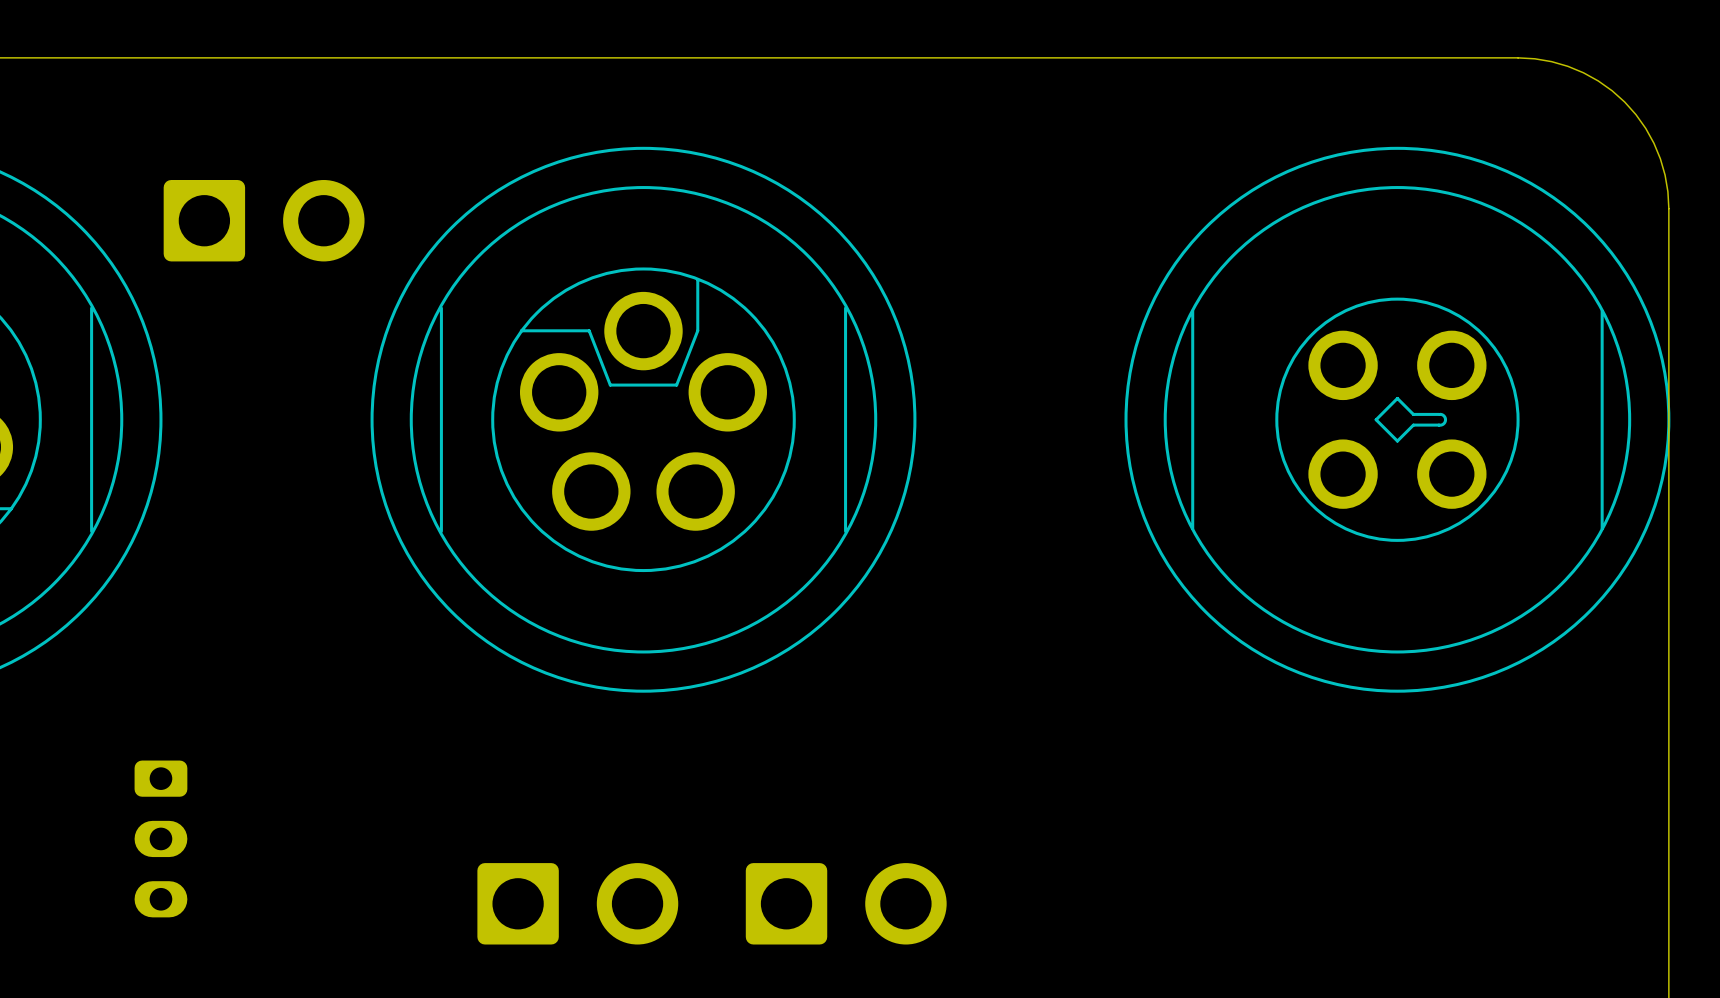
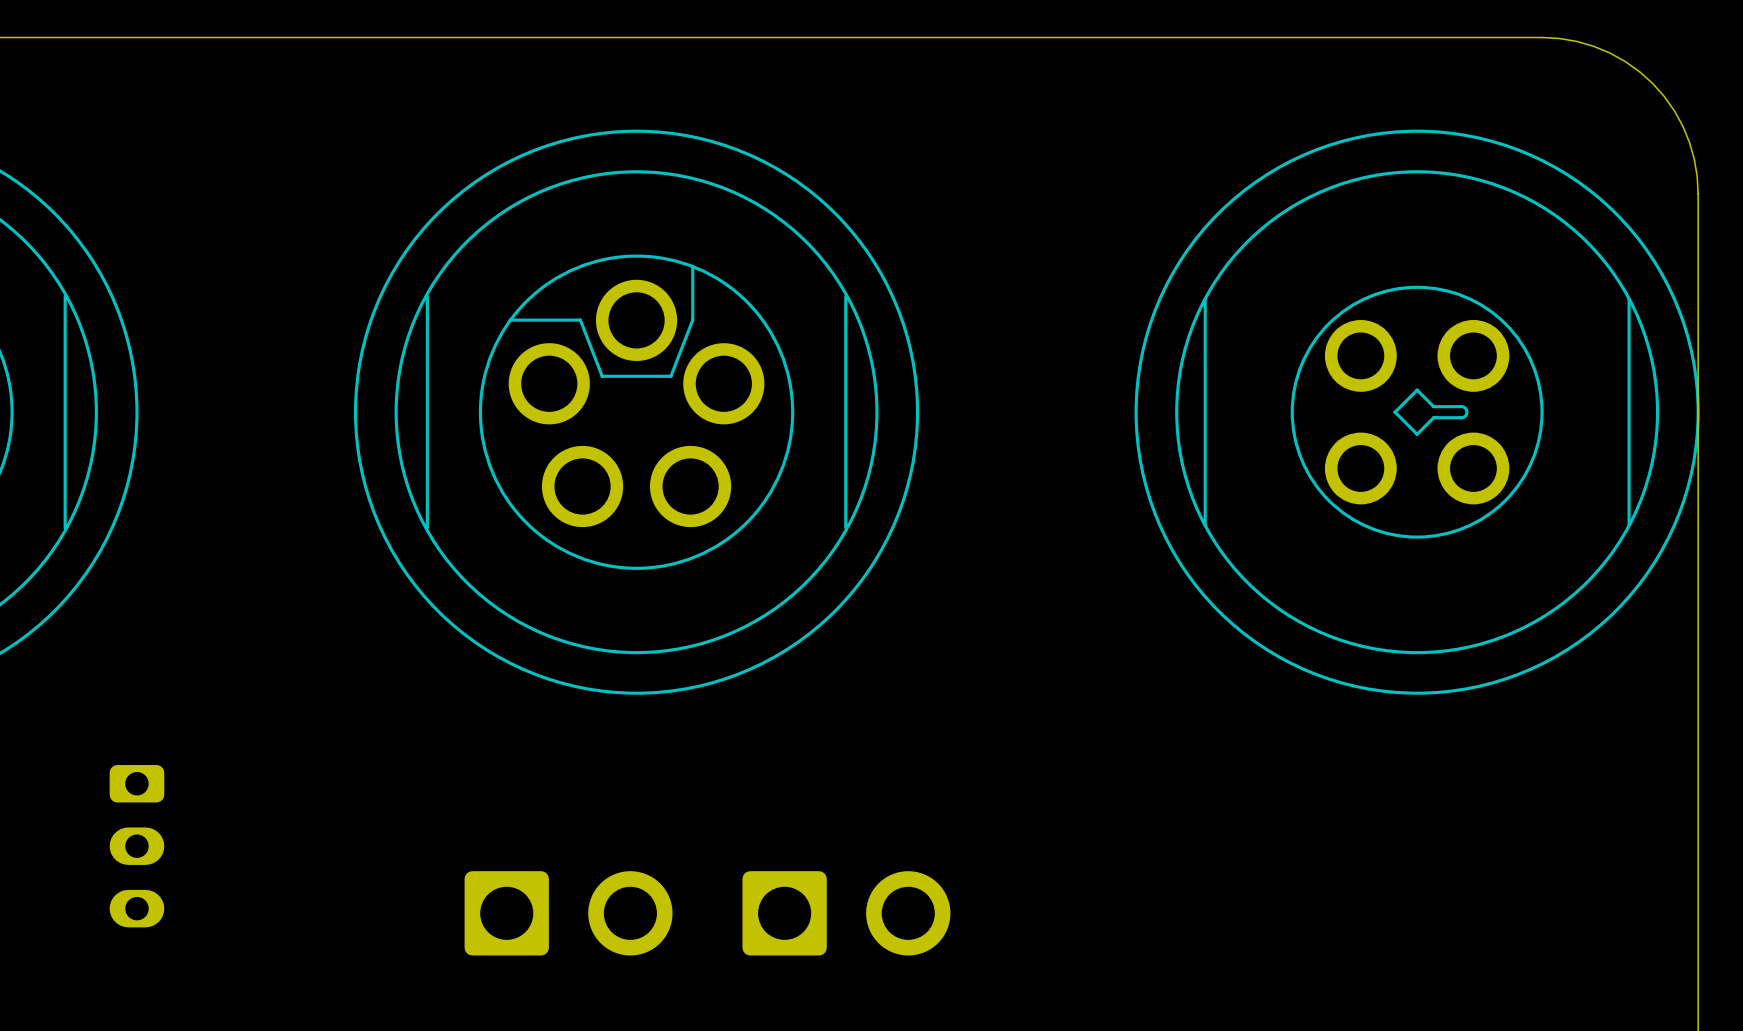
part: (264, 220) -> none

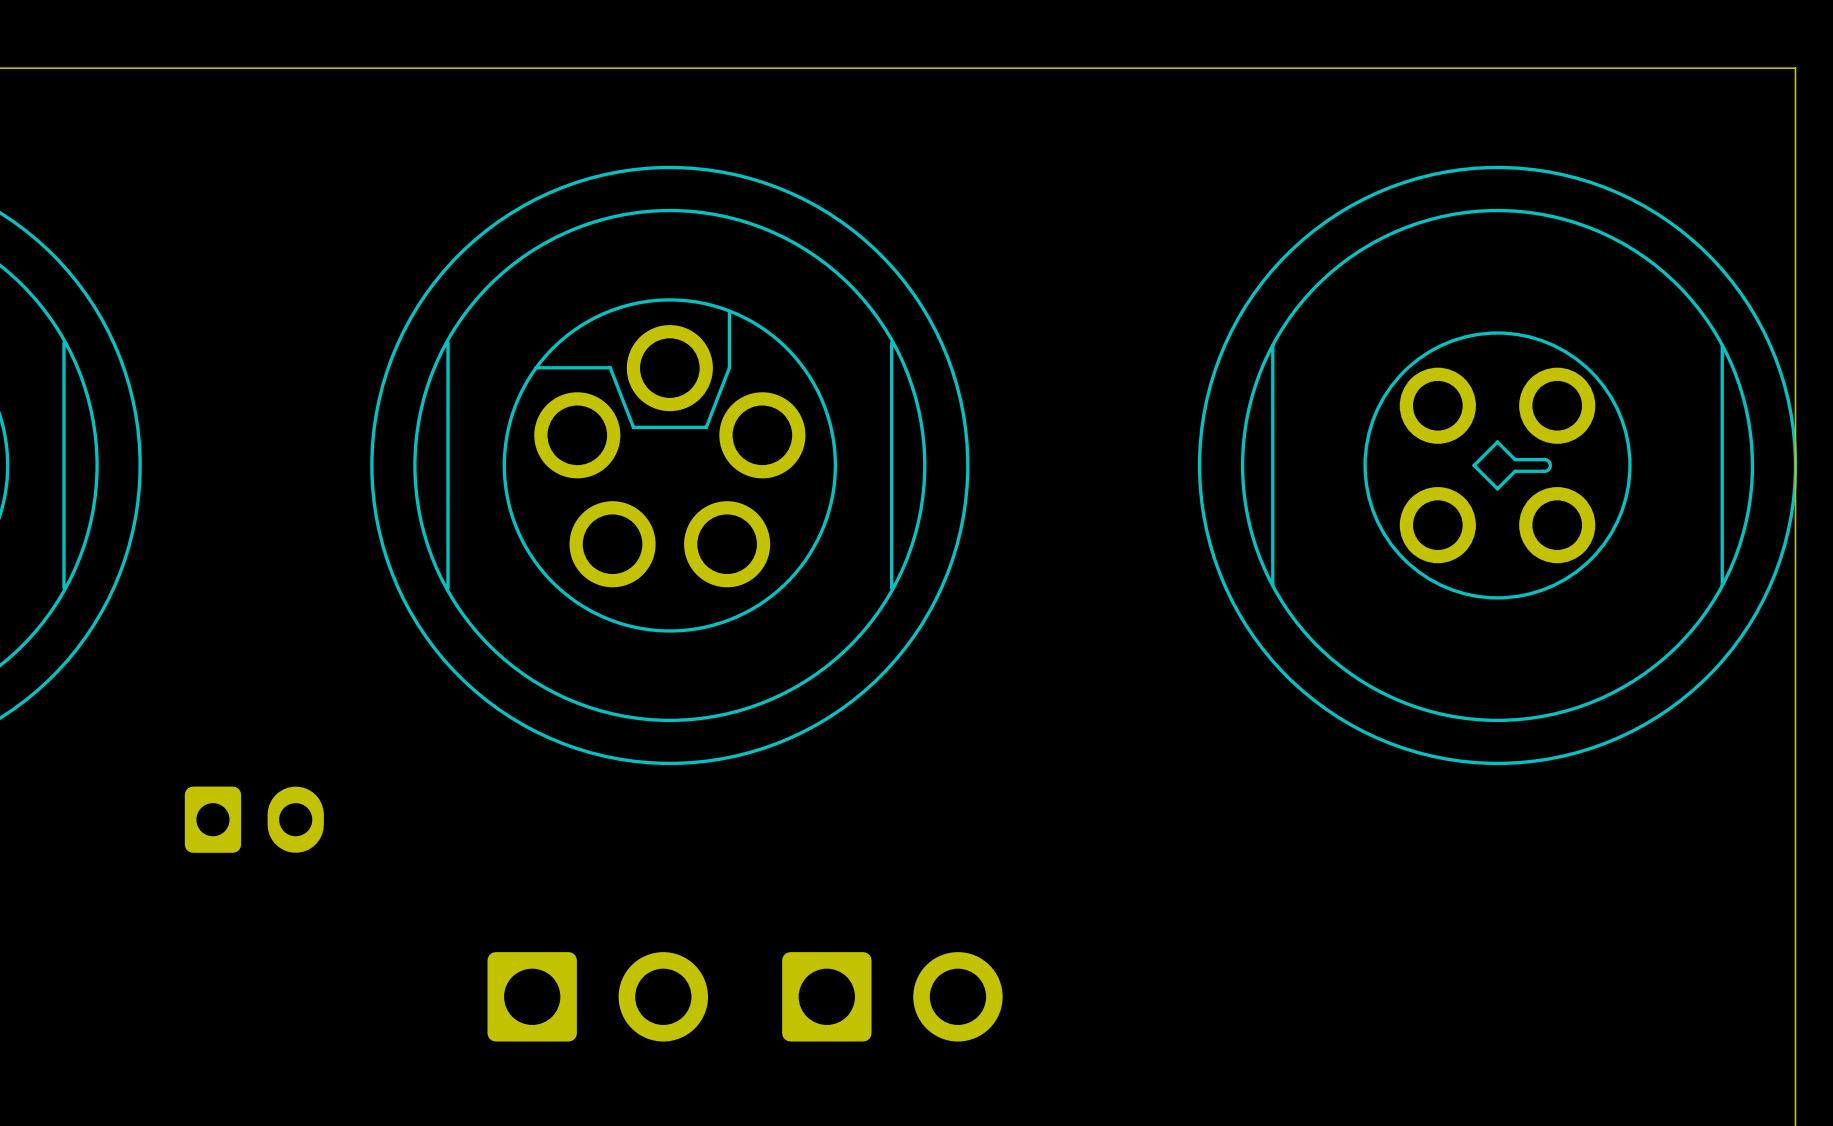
board edge: (1542, 37) (1576, 41) (1609, 52) (1639, 71) (1652, 83) (1674, 110) (1689, 142) (1697, 176) (1698, 193) -> (1629, 68) (1795, 68) (1795, 233)
part: none -> (254, 819)
part: (136, 846) -> none

